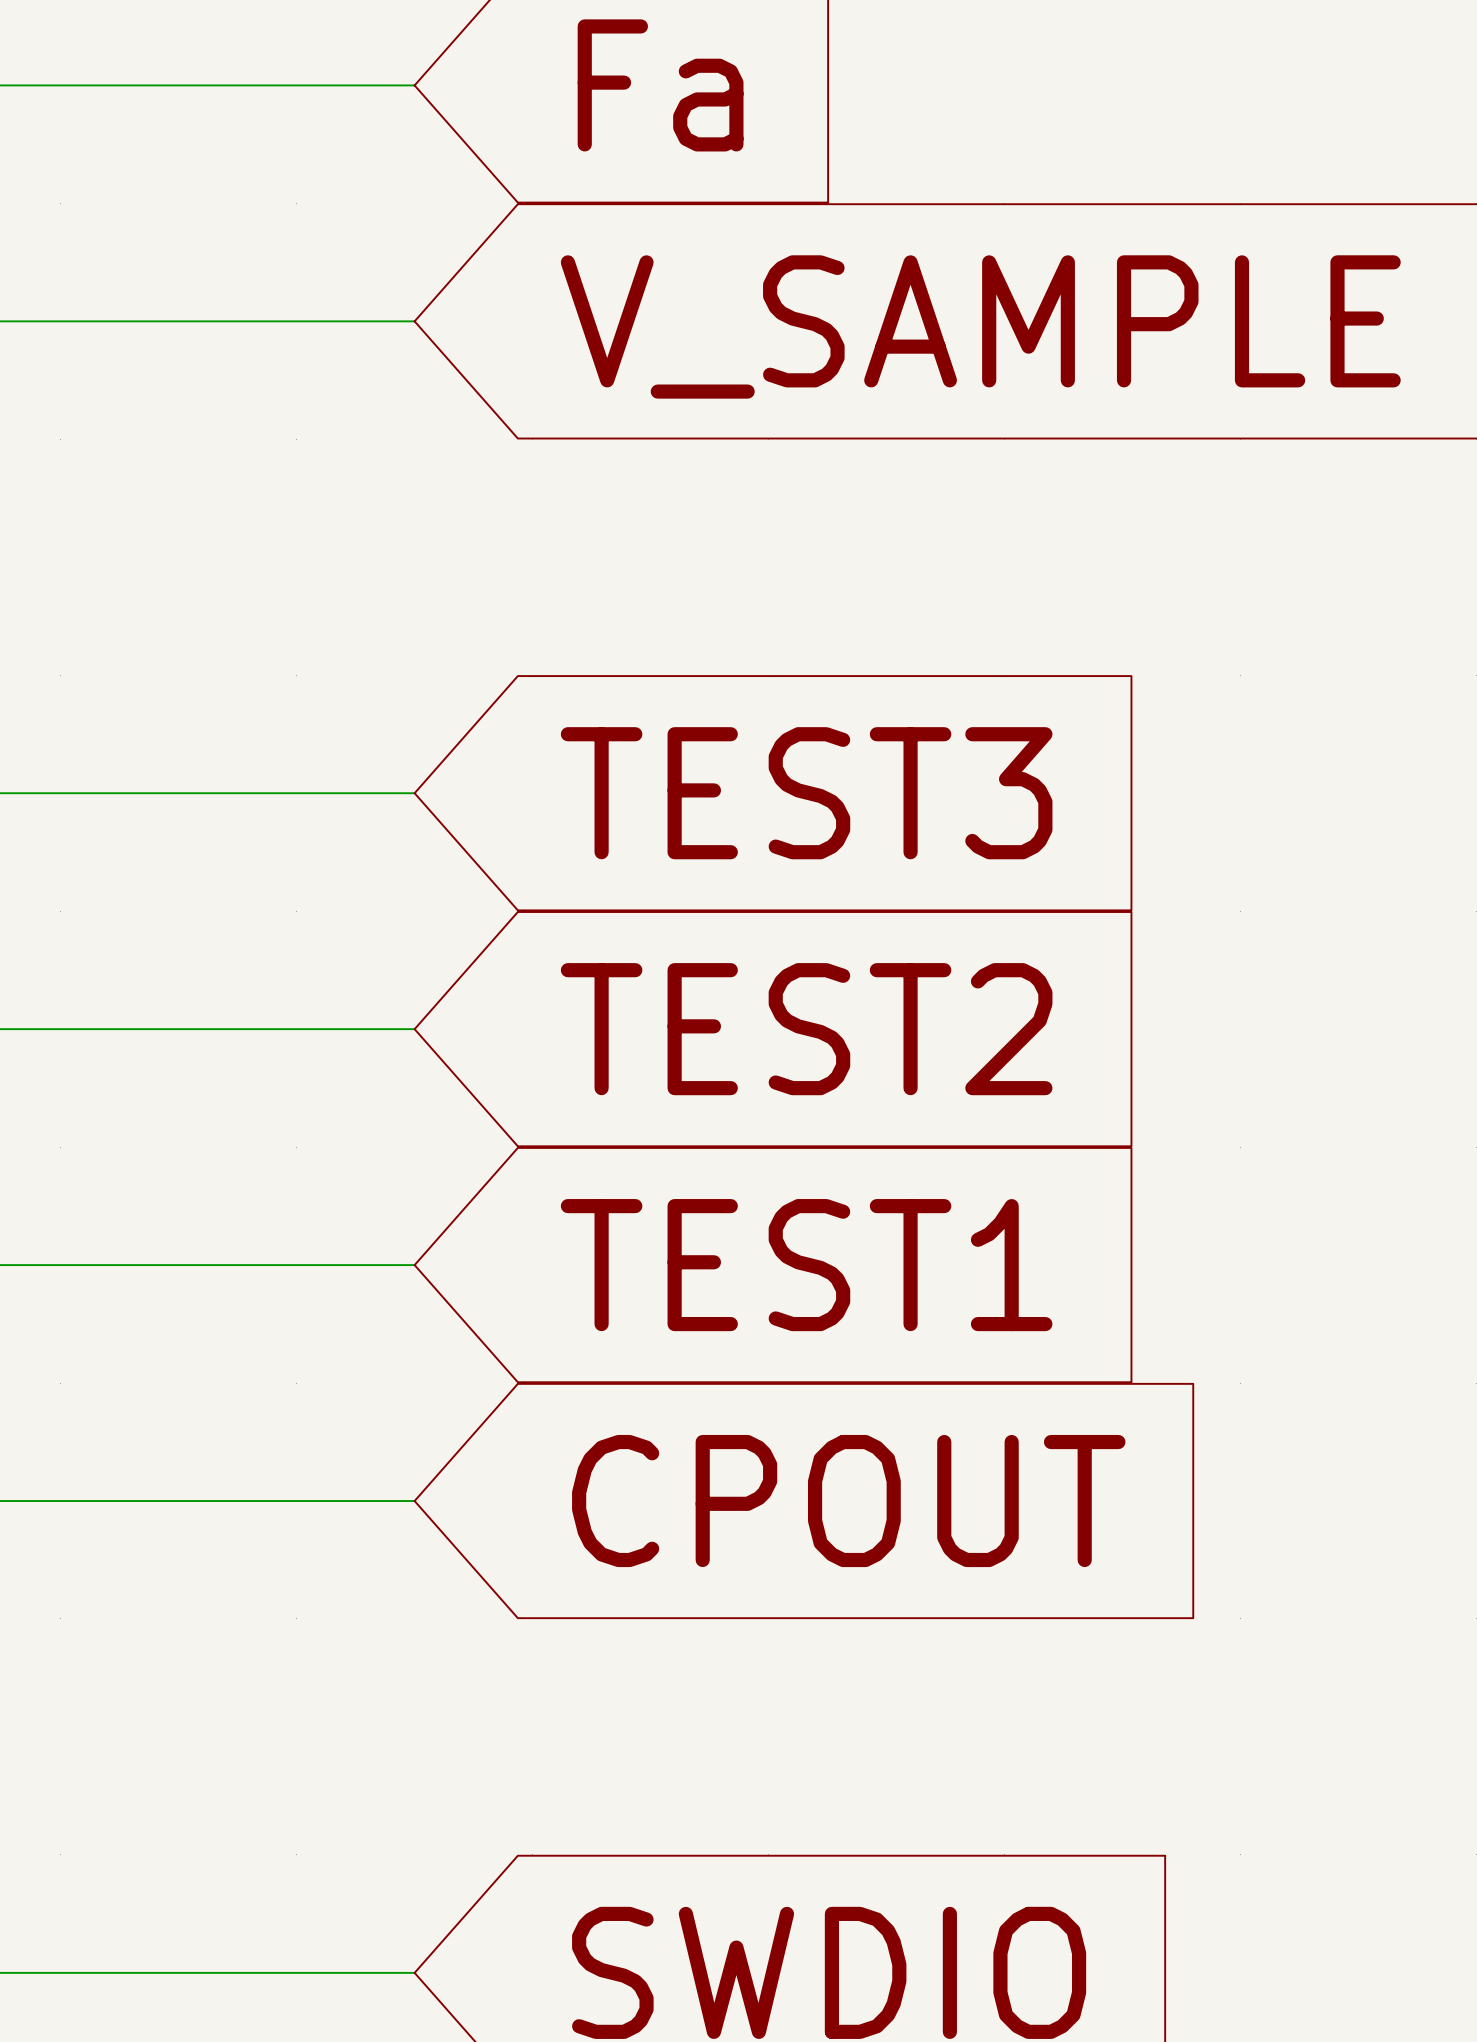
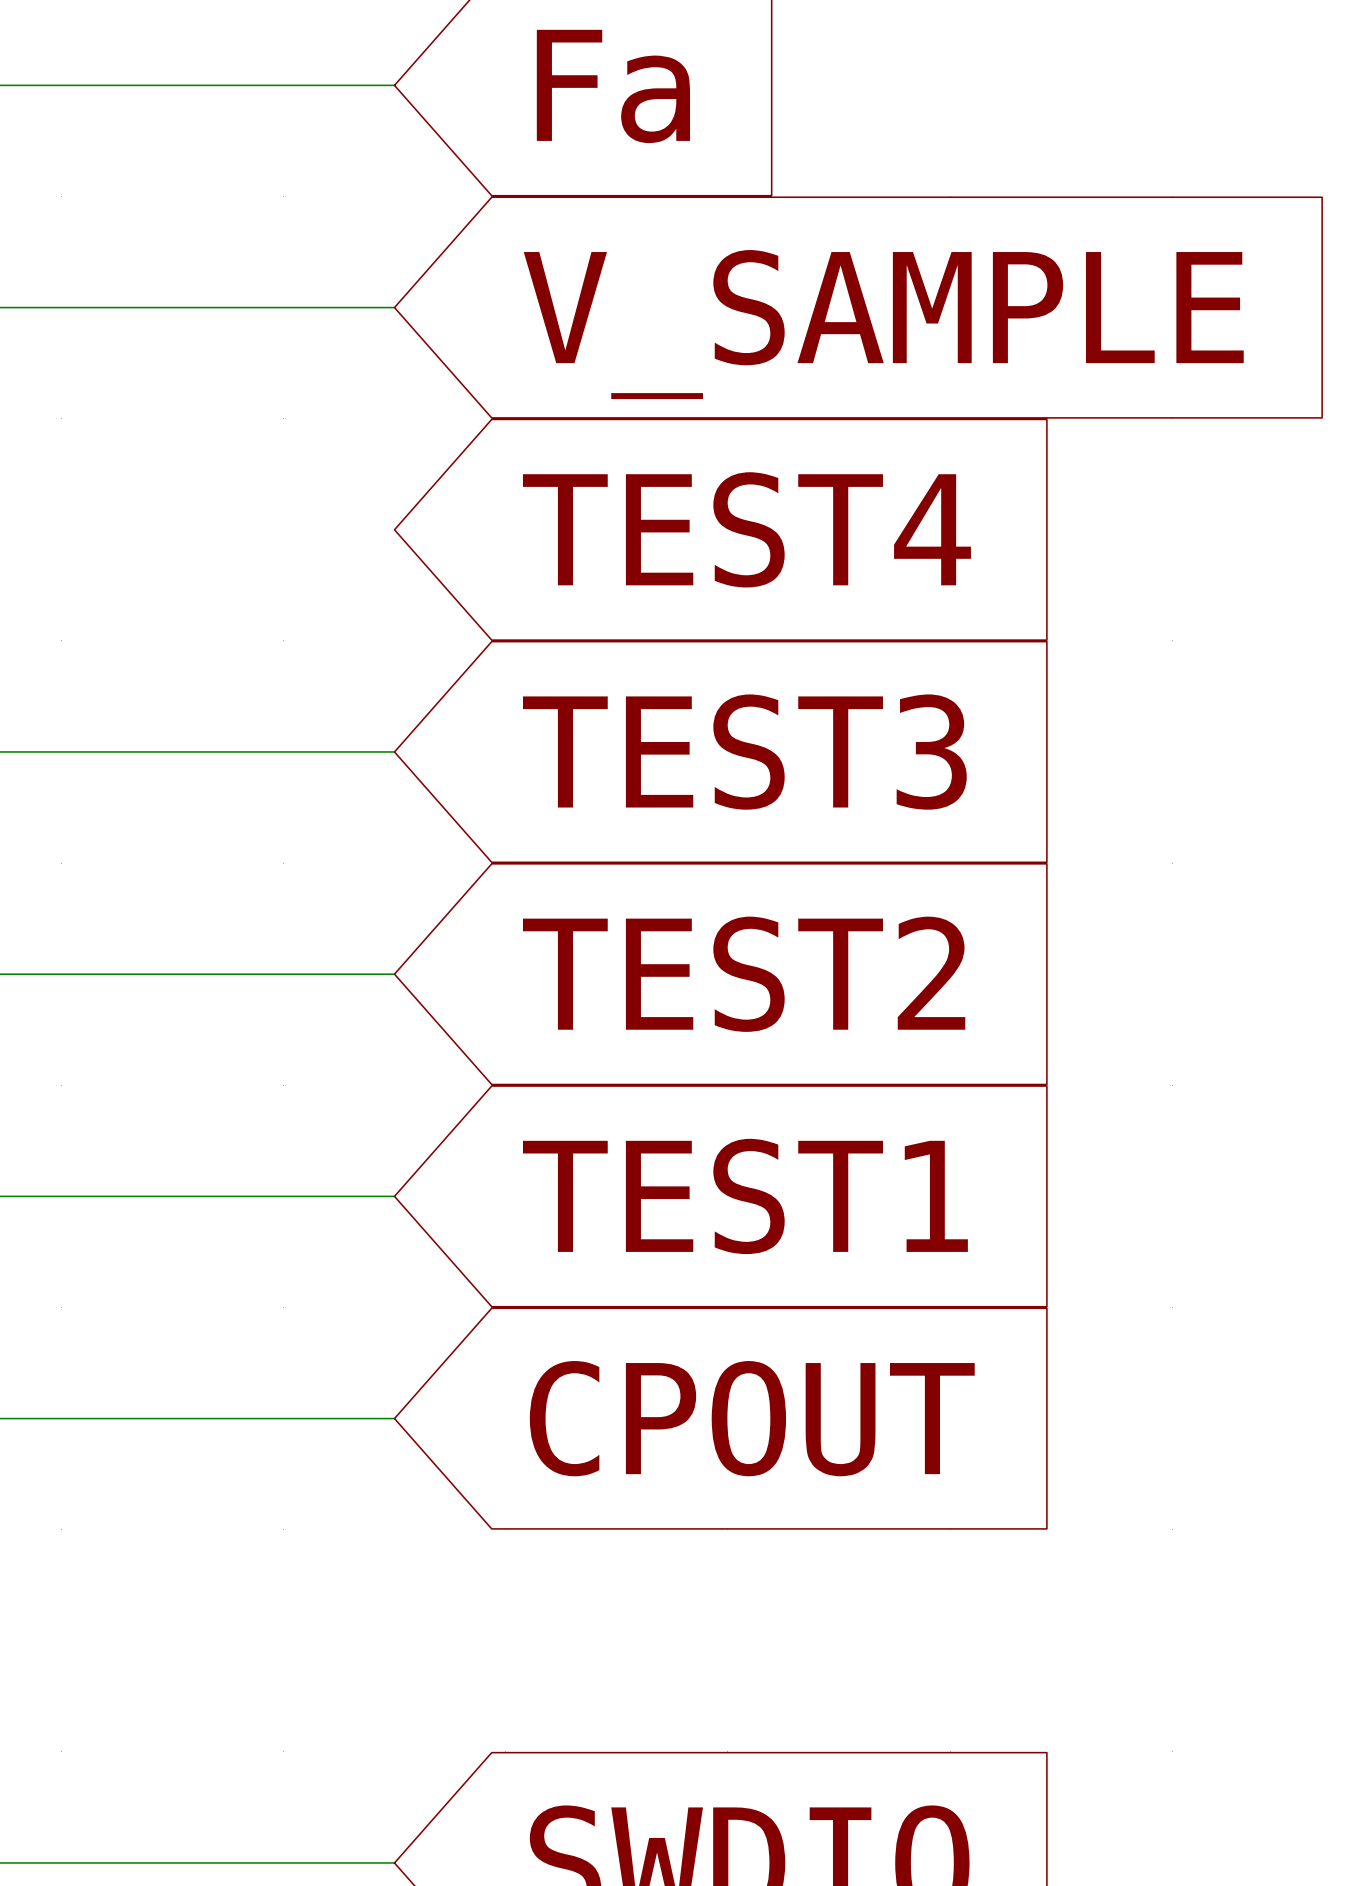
global label: none -> TEST4 (746, 529)

